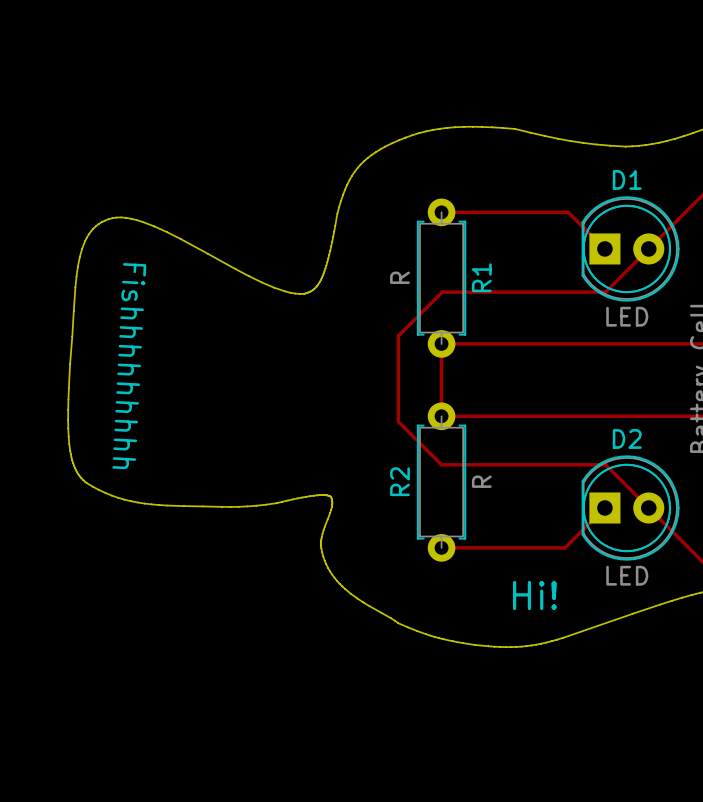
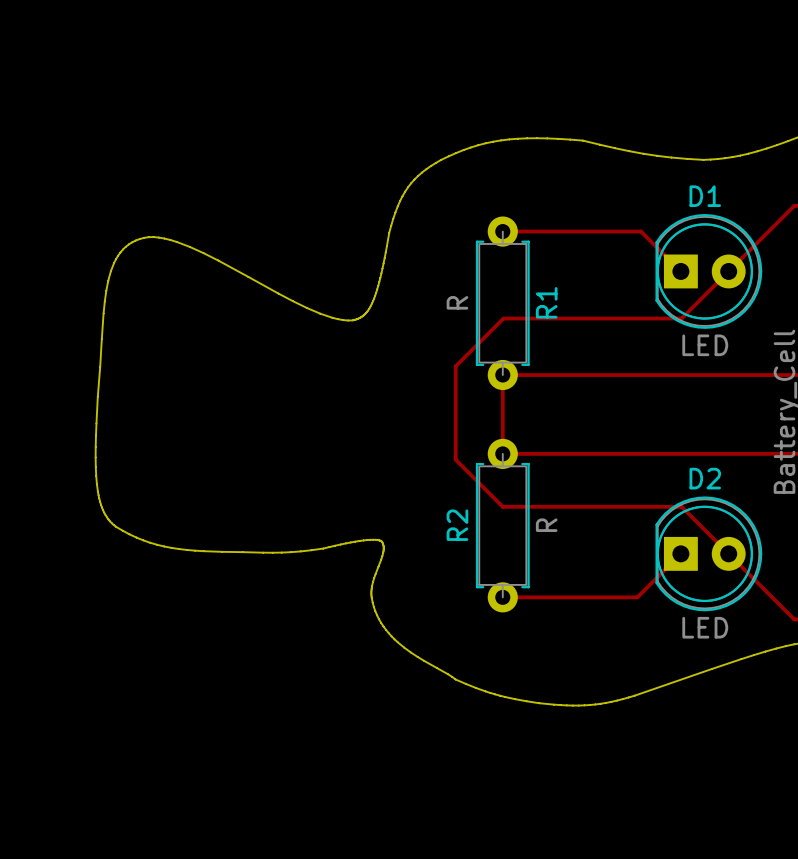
text: Fishhhhhhhhh (129, 366) -> none
text: Hi! (534, 595) -> none

